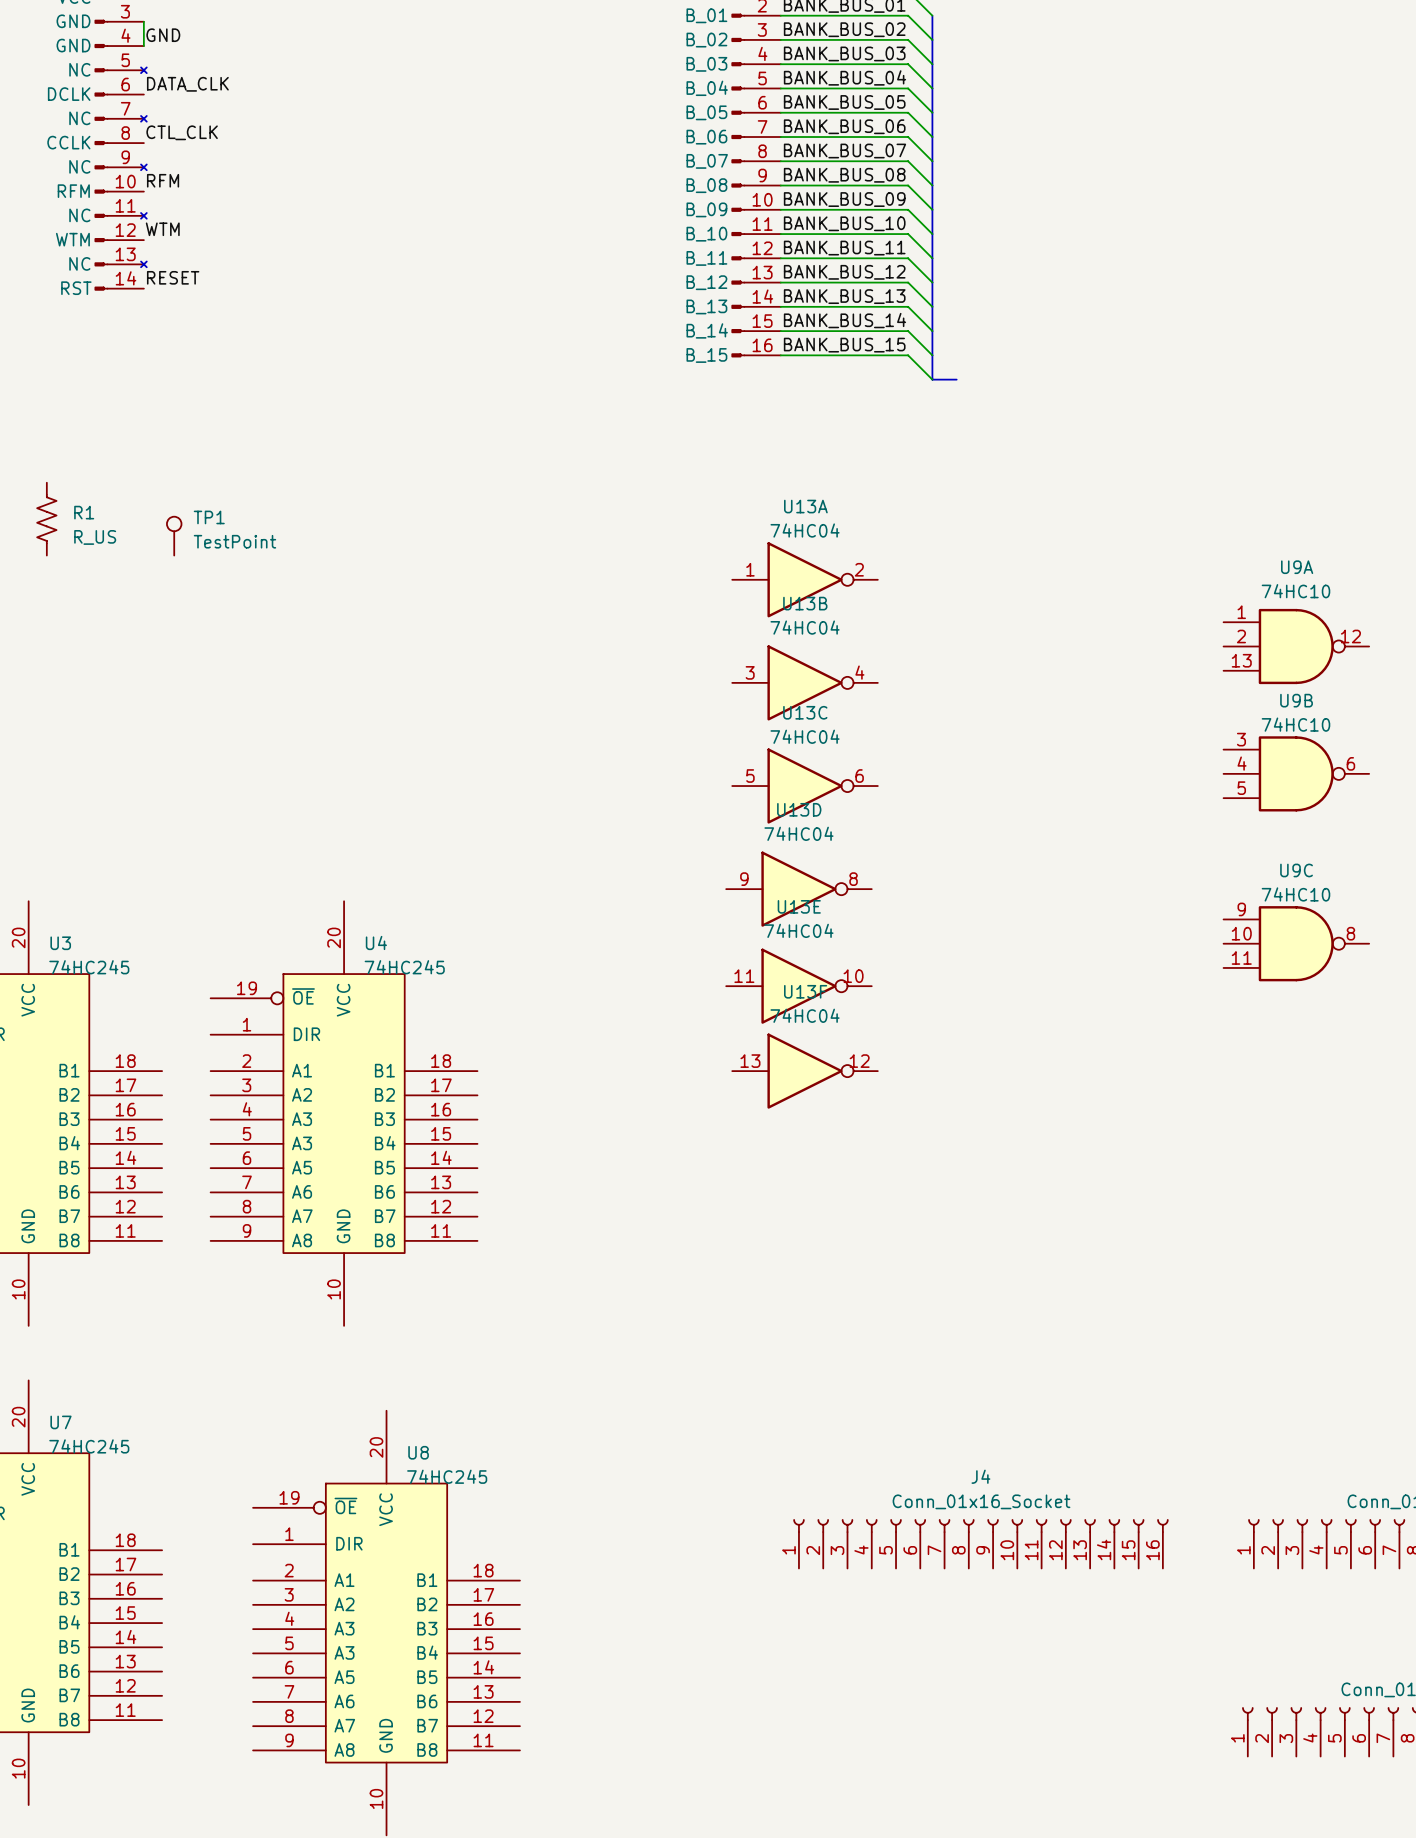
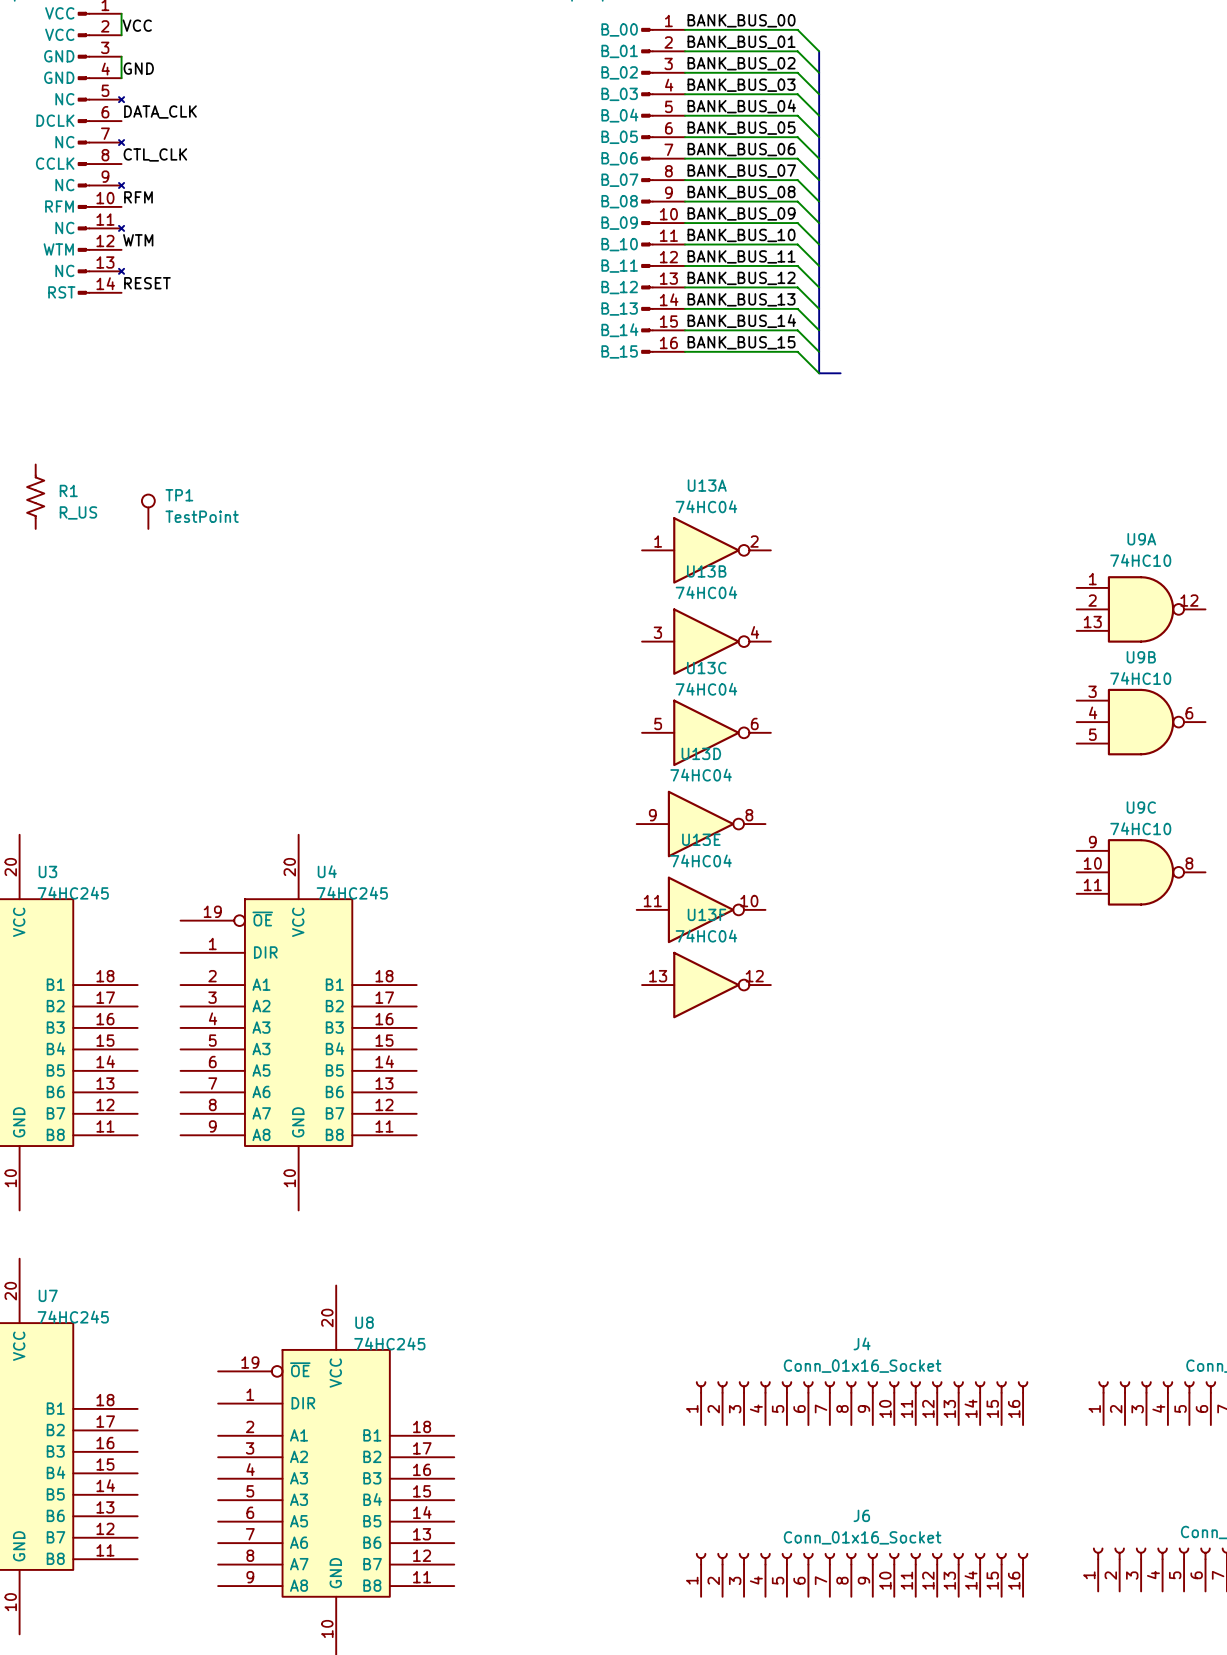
J6: none -> Conn_01x16_Socket (862, 1574)

